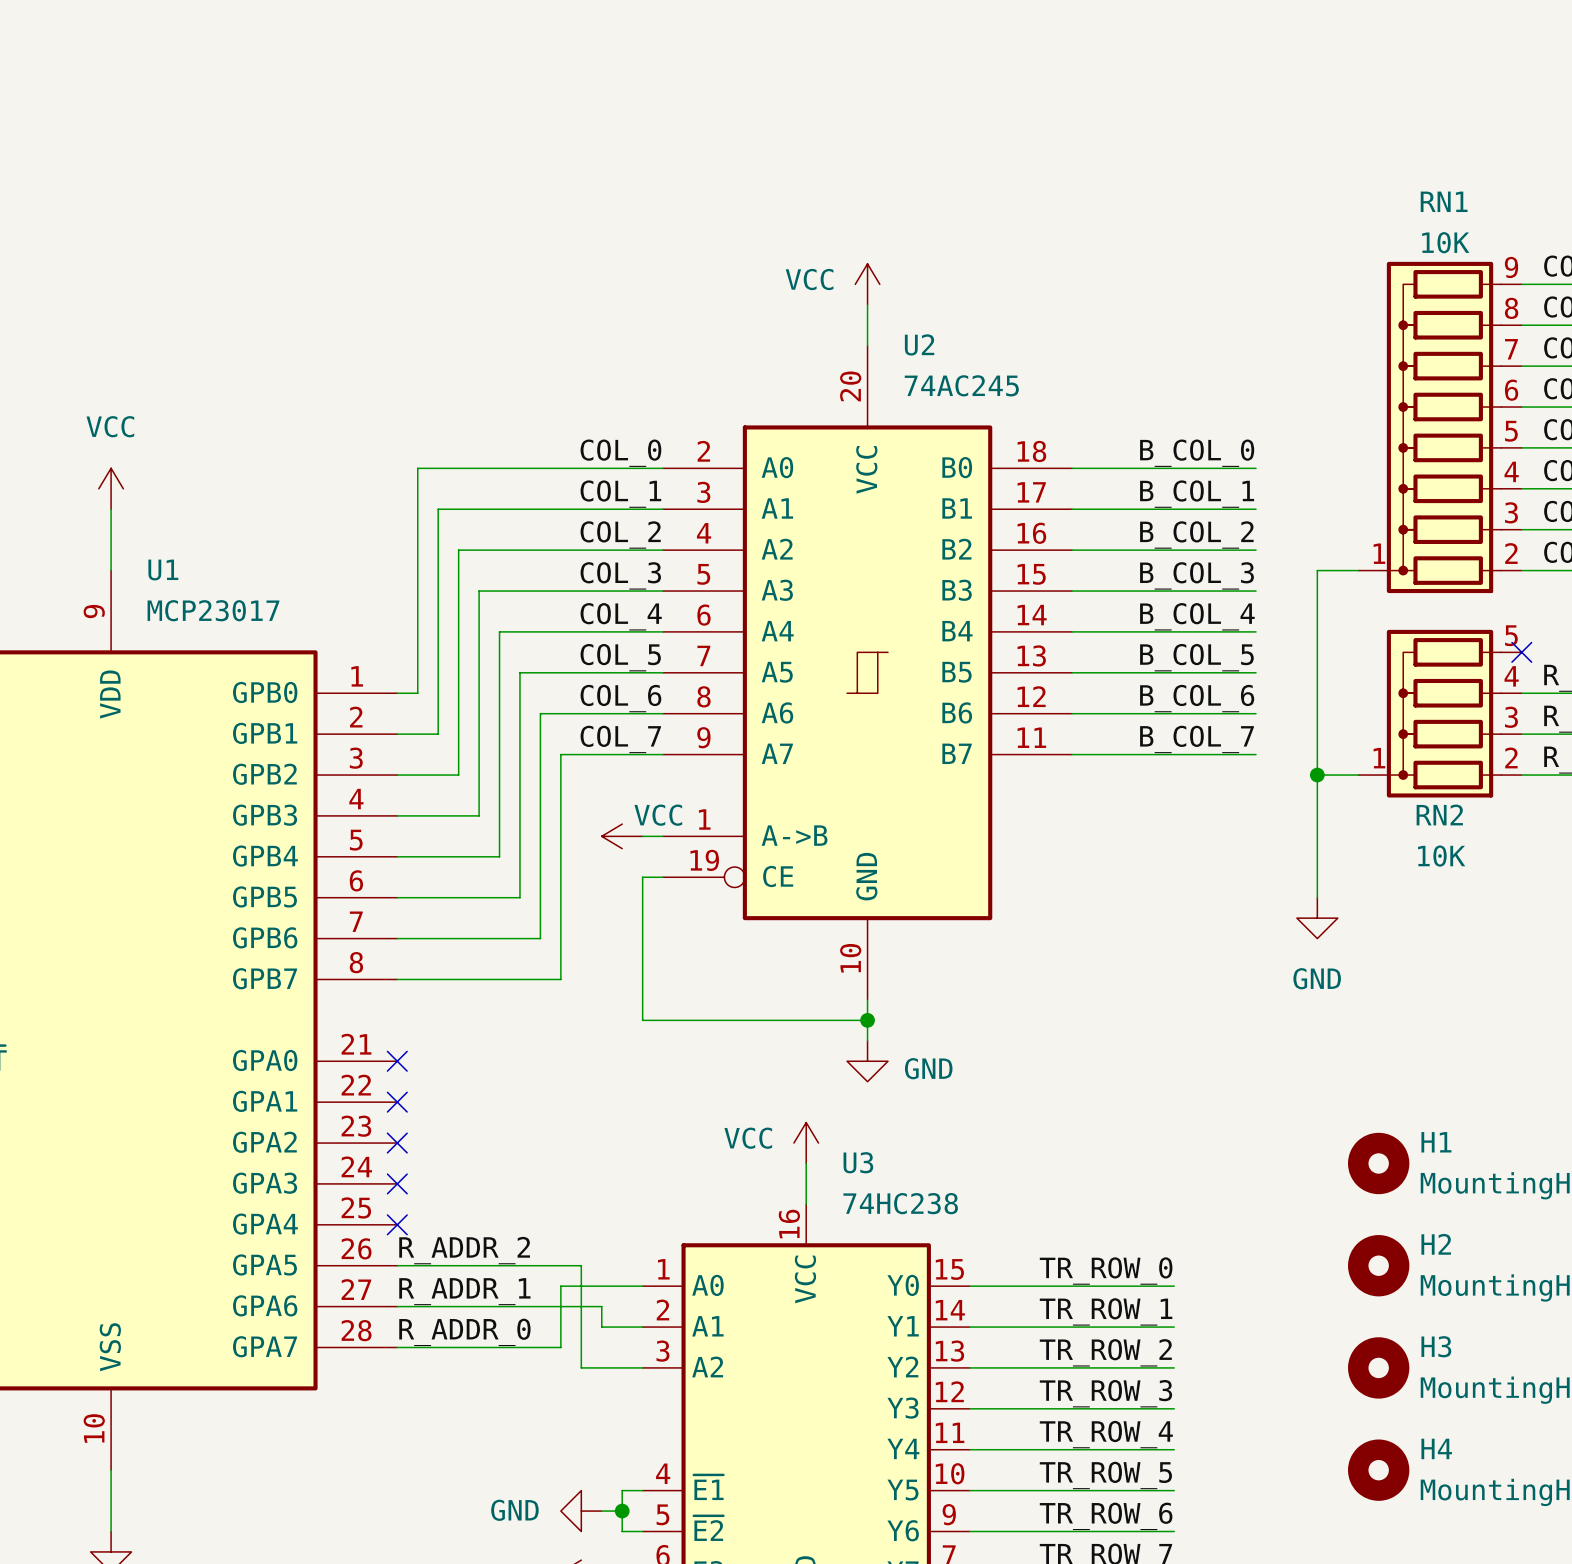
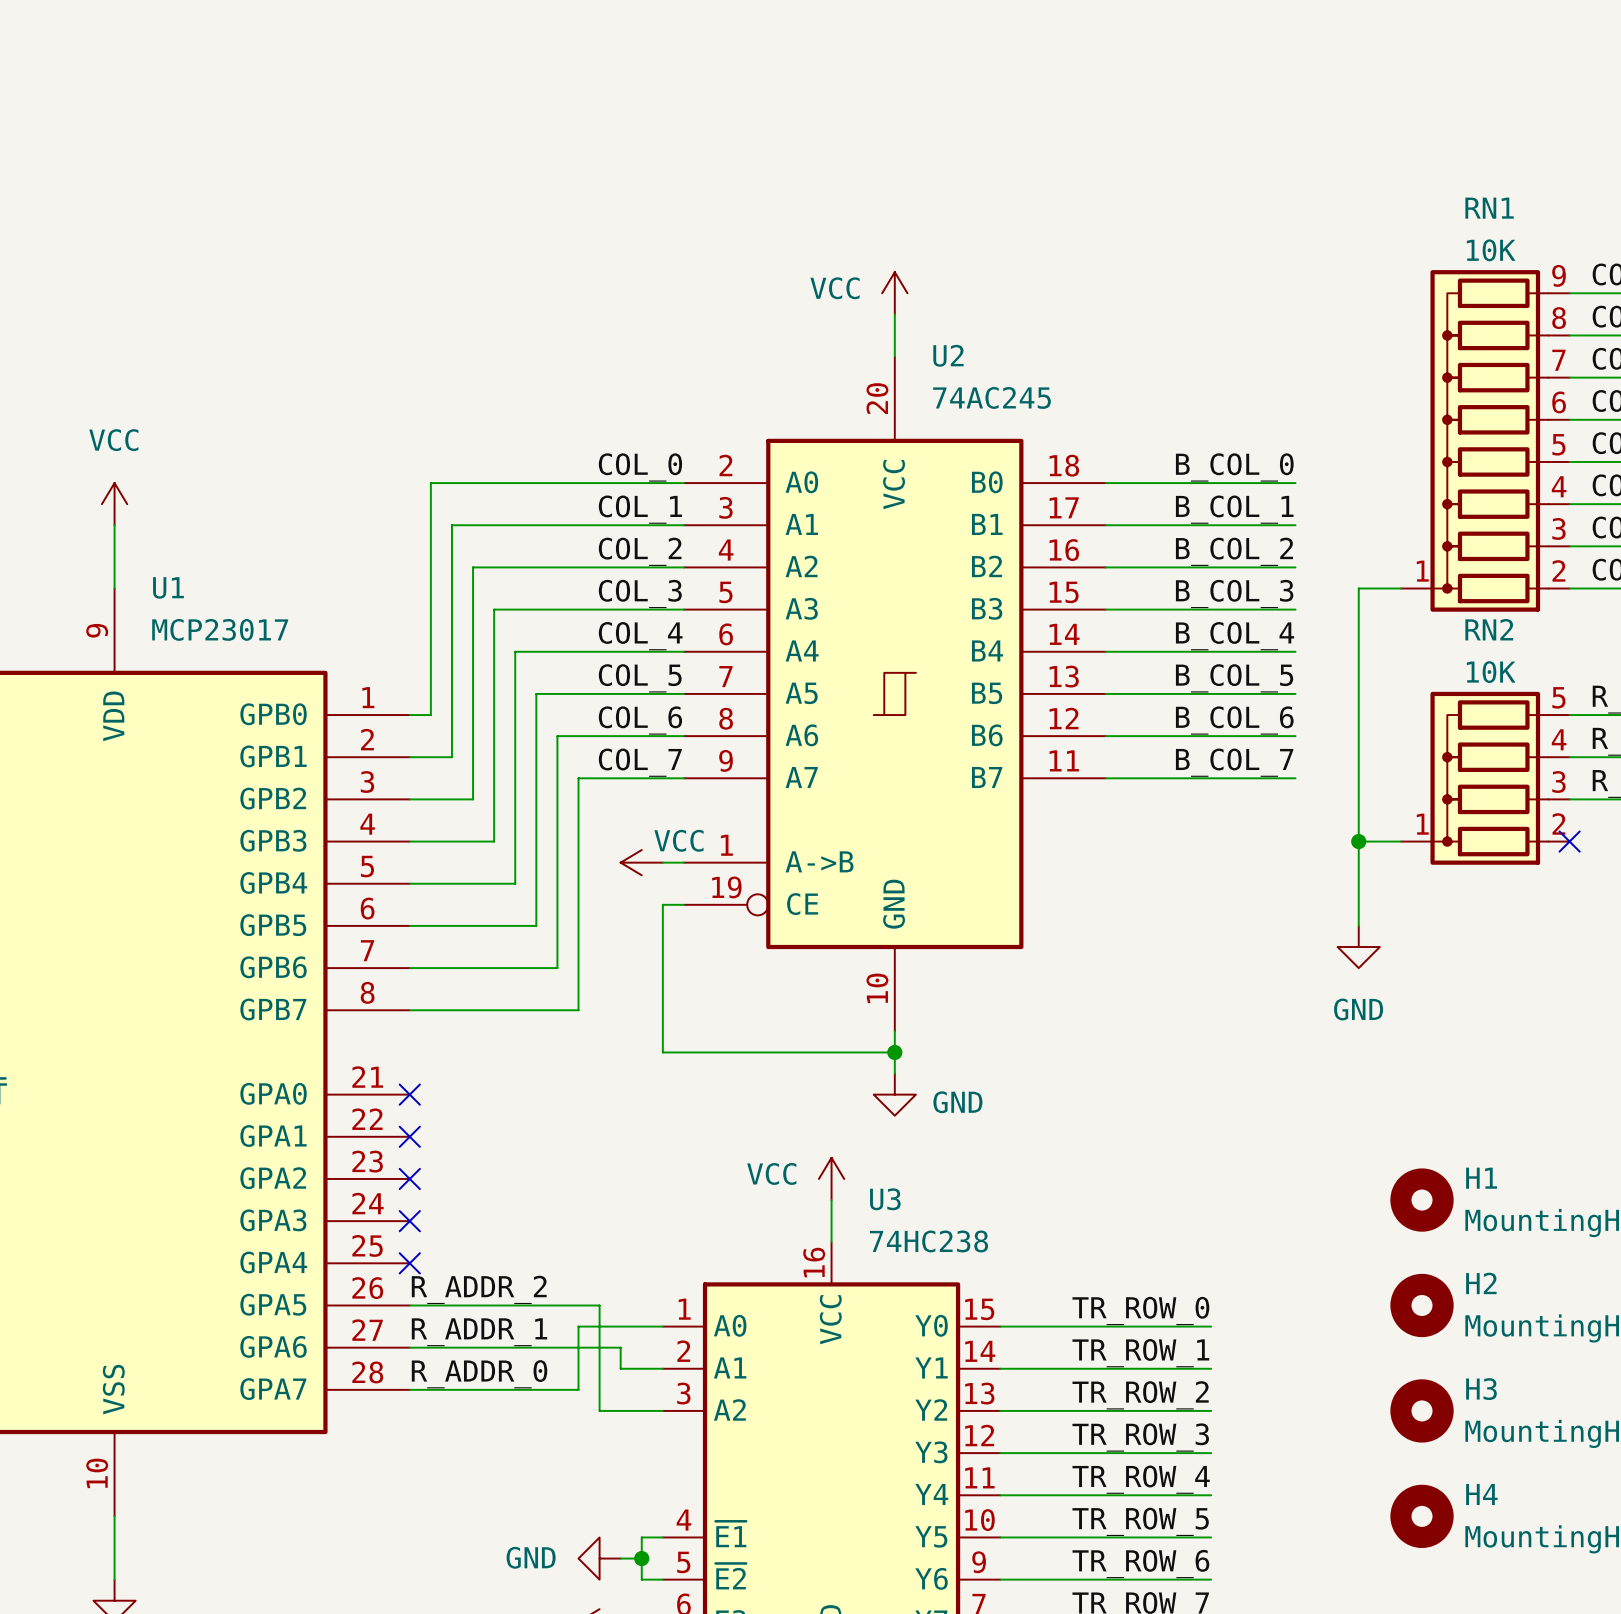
no-connect mark: (1521, 652) -> none
RN2 position: (1440, 713) -> (1485, 778)
wire: (1317, 775) (1358, 775) -> (1358, 841) (1400, 841)
junction position: (1317, 775) -> (1358, 841)
RN2 name position: RN2 (1439, 814) -> RN2 (1489, 629)
no-connect mark: none -> (1569, 841)
RN2 value position: 10K (1441, 856) -> 10K (1491, 672)

